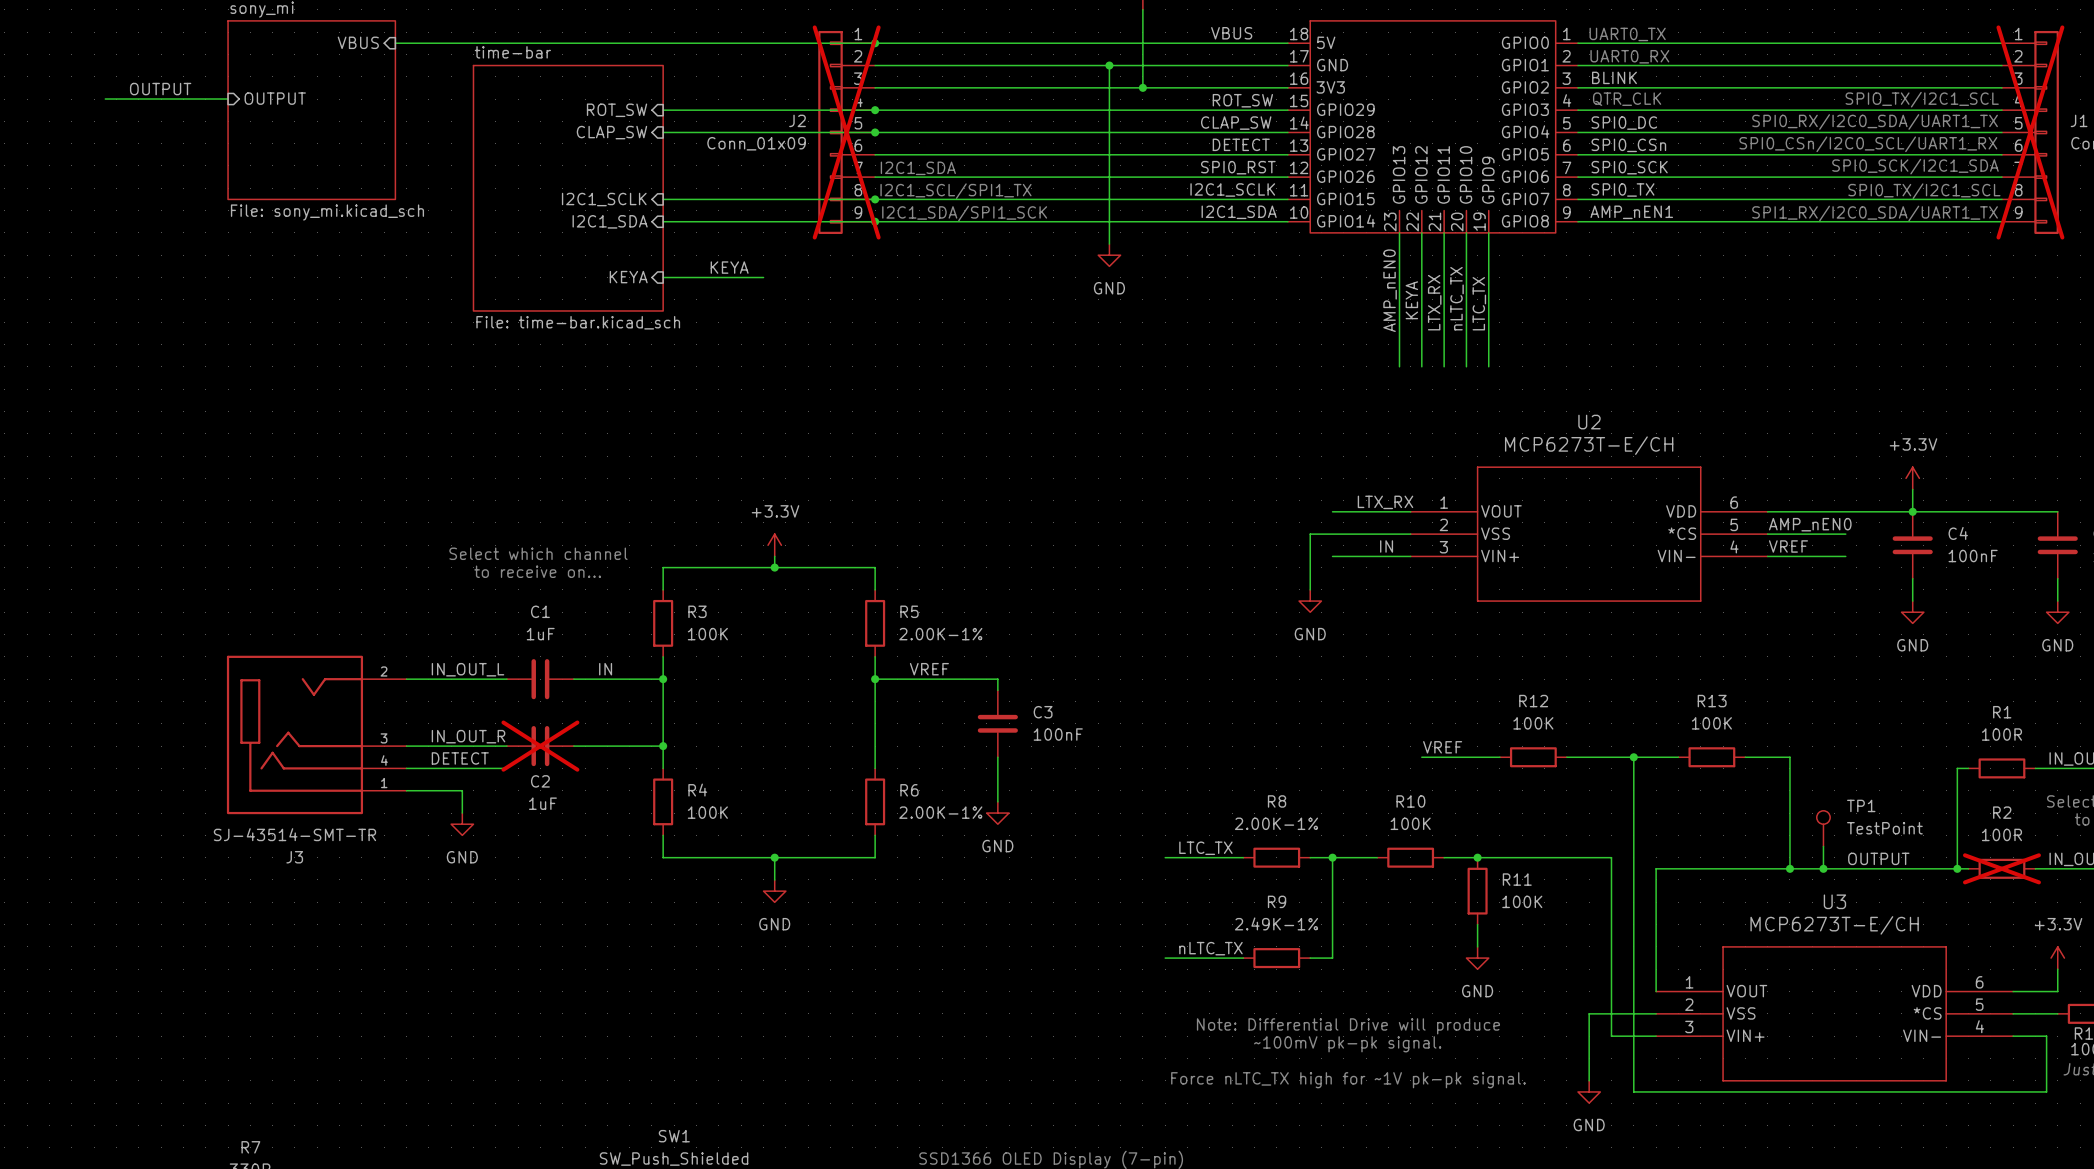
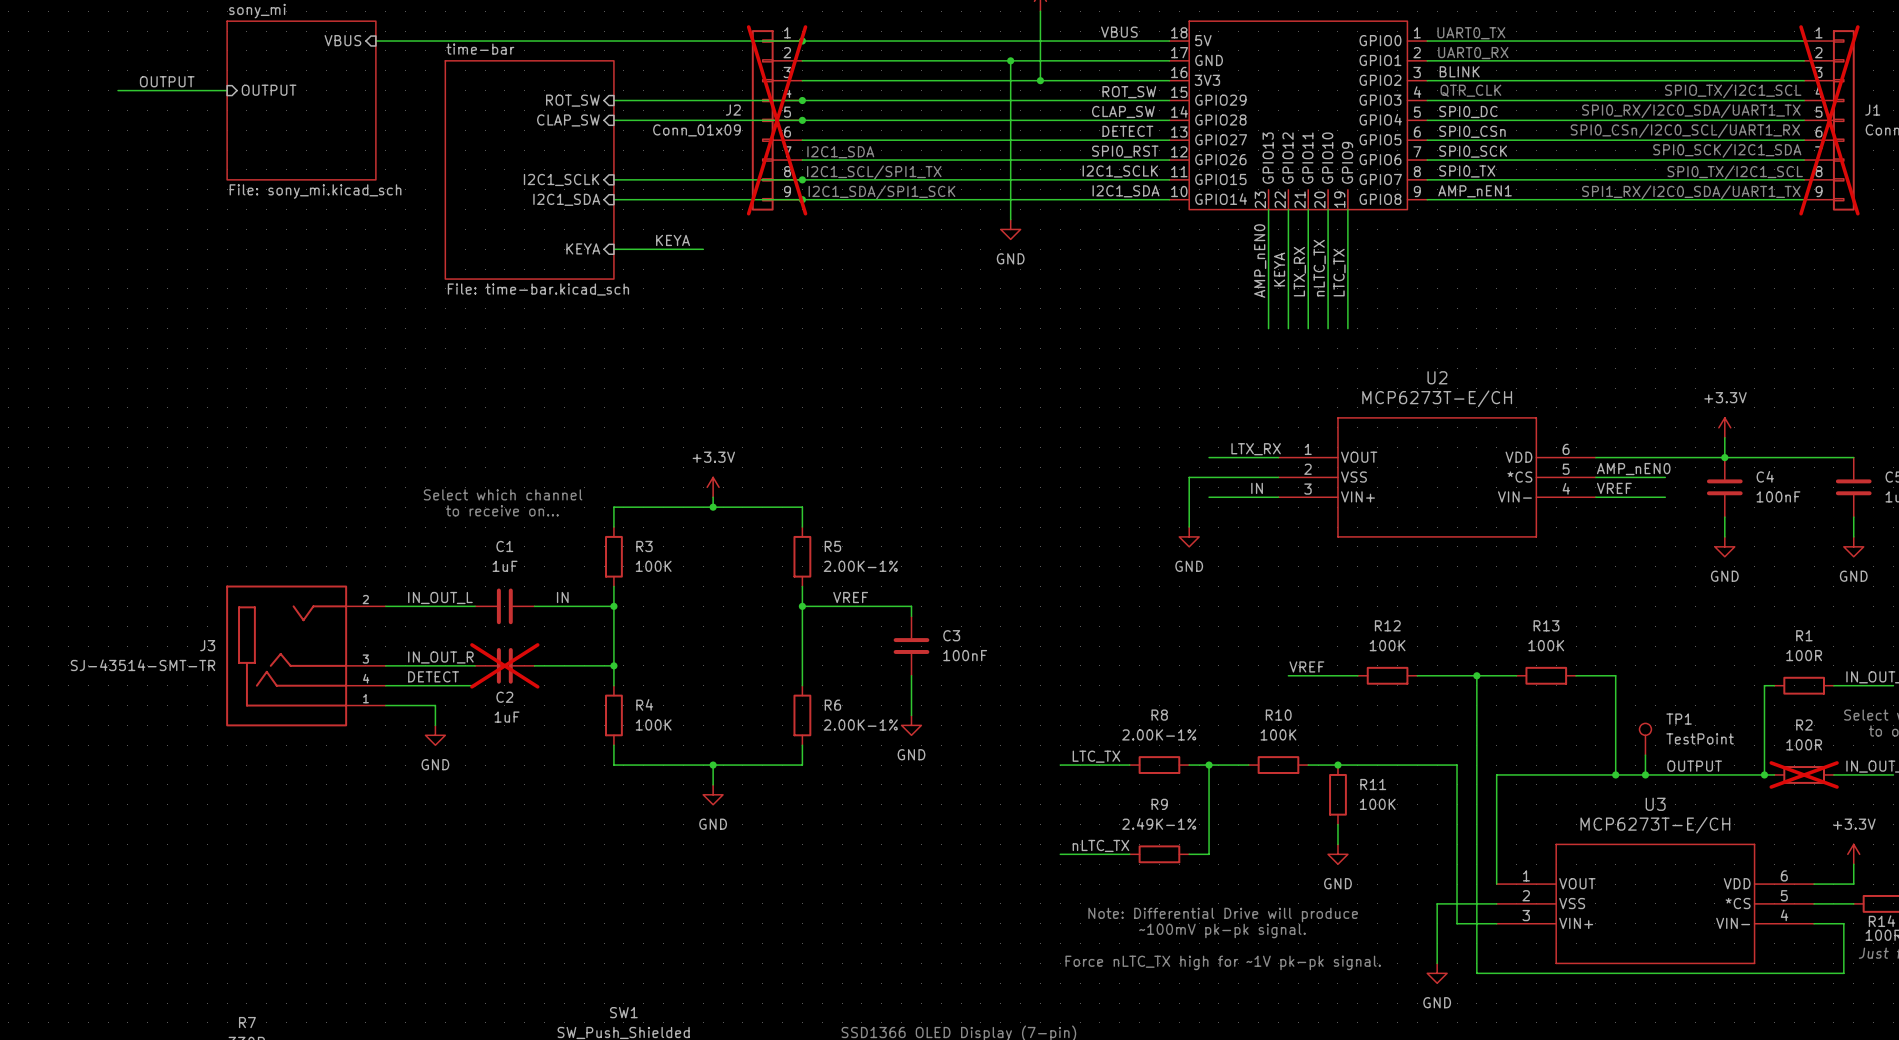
J3 value position: SJ-43514-SMT-TR (294, 834) -> SJ-43514-SMT-TR (142, 665)
J3 name position: J3 (294, 857) -> J3 (207, 645)

